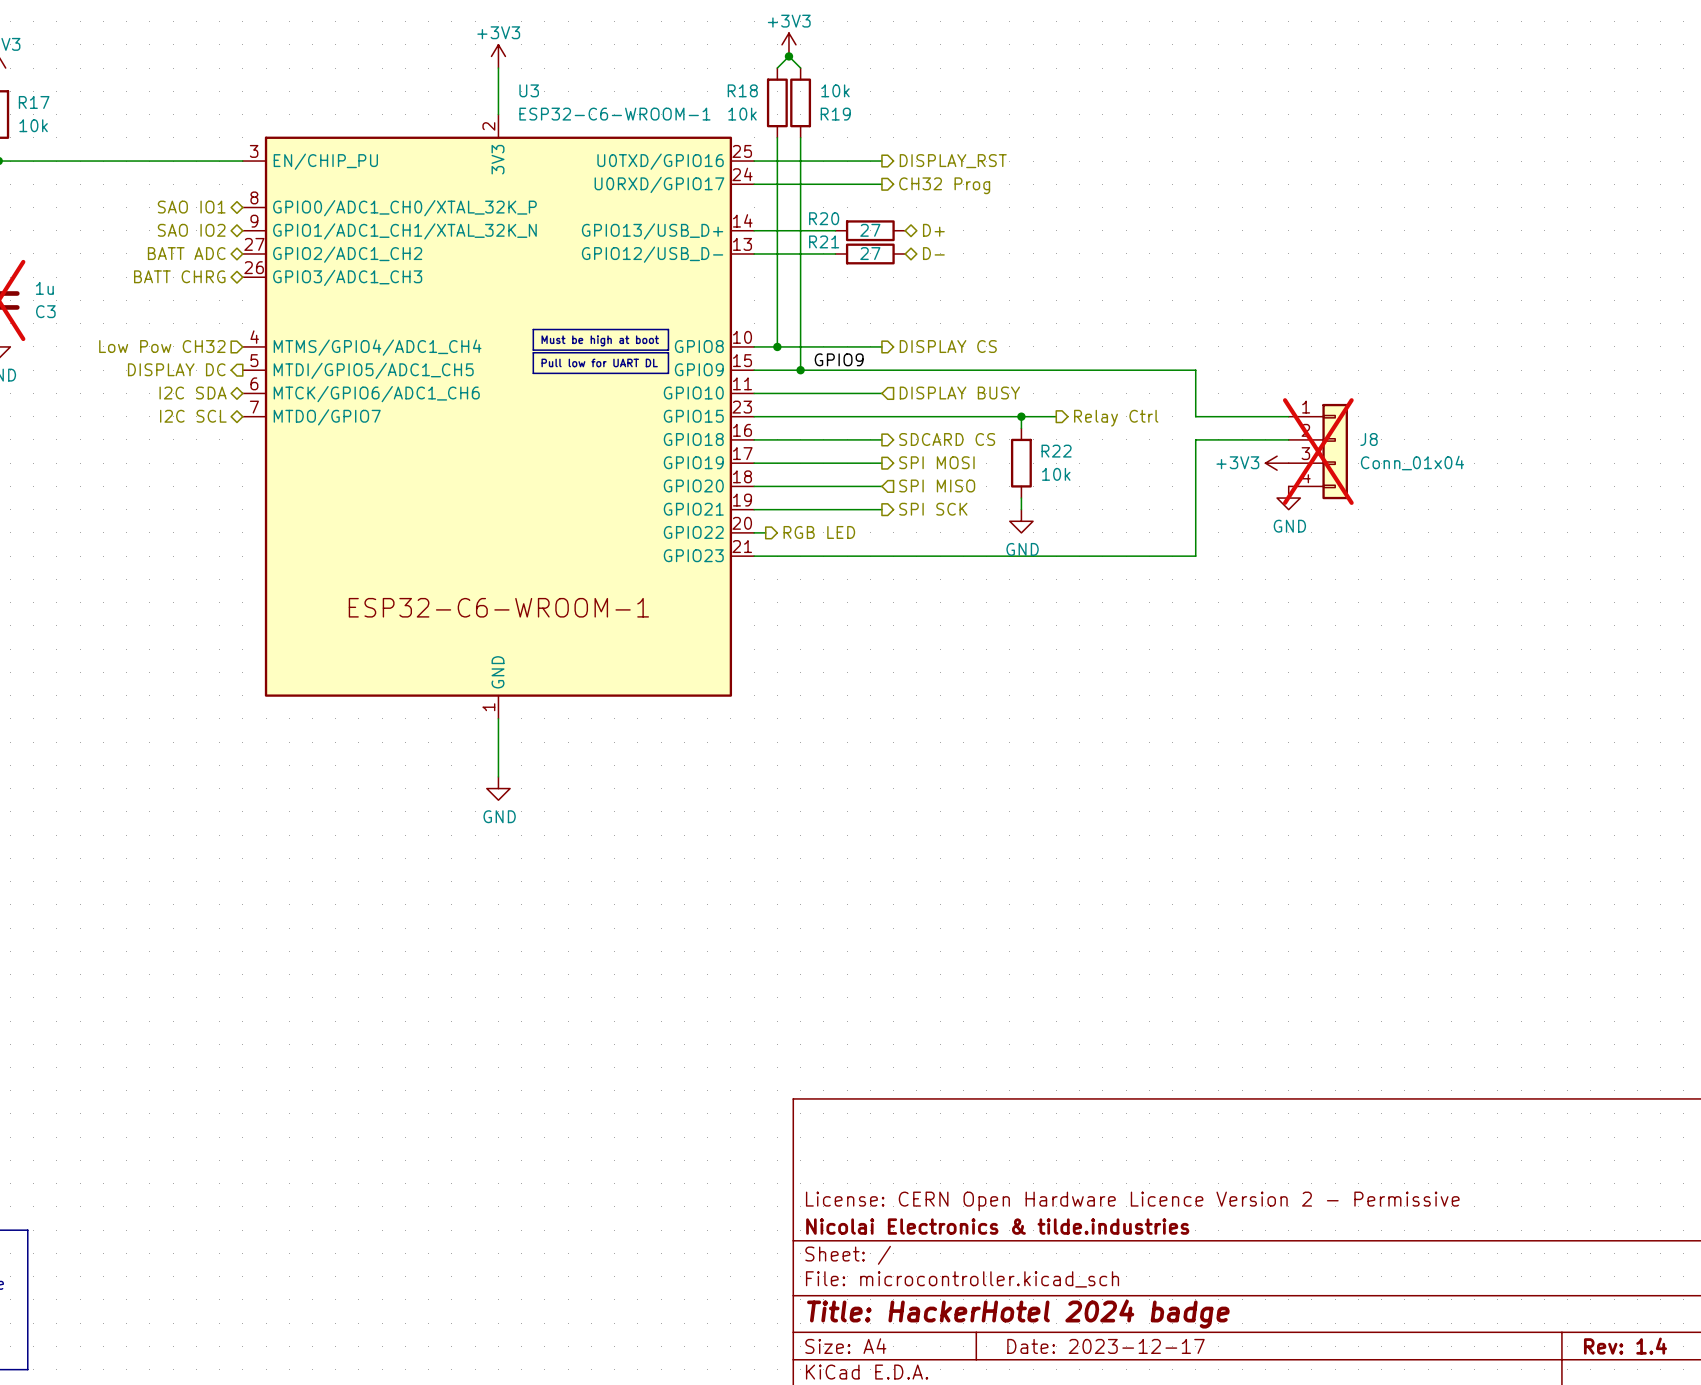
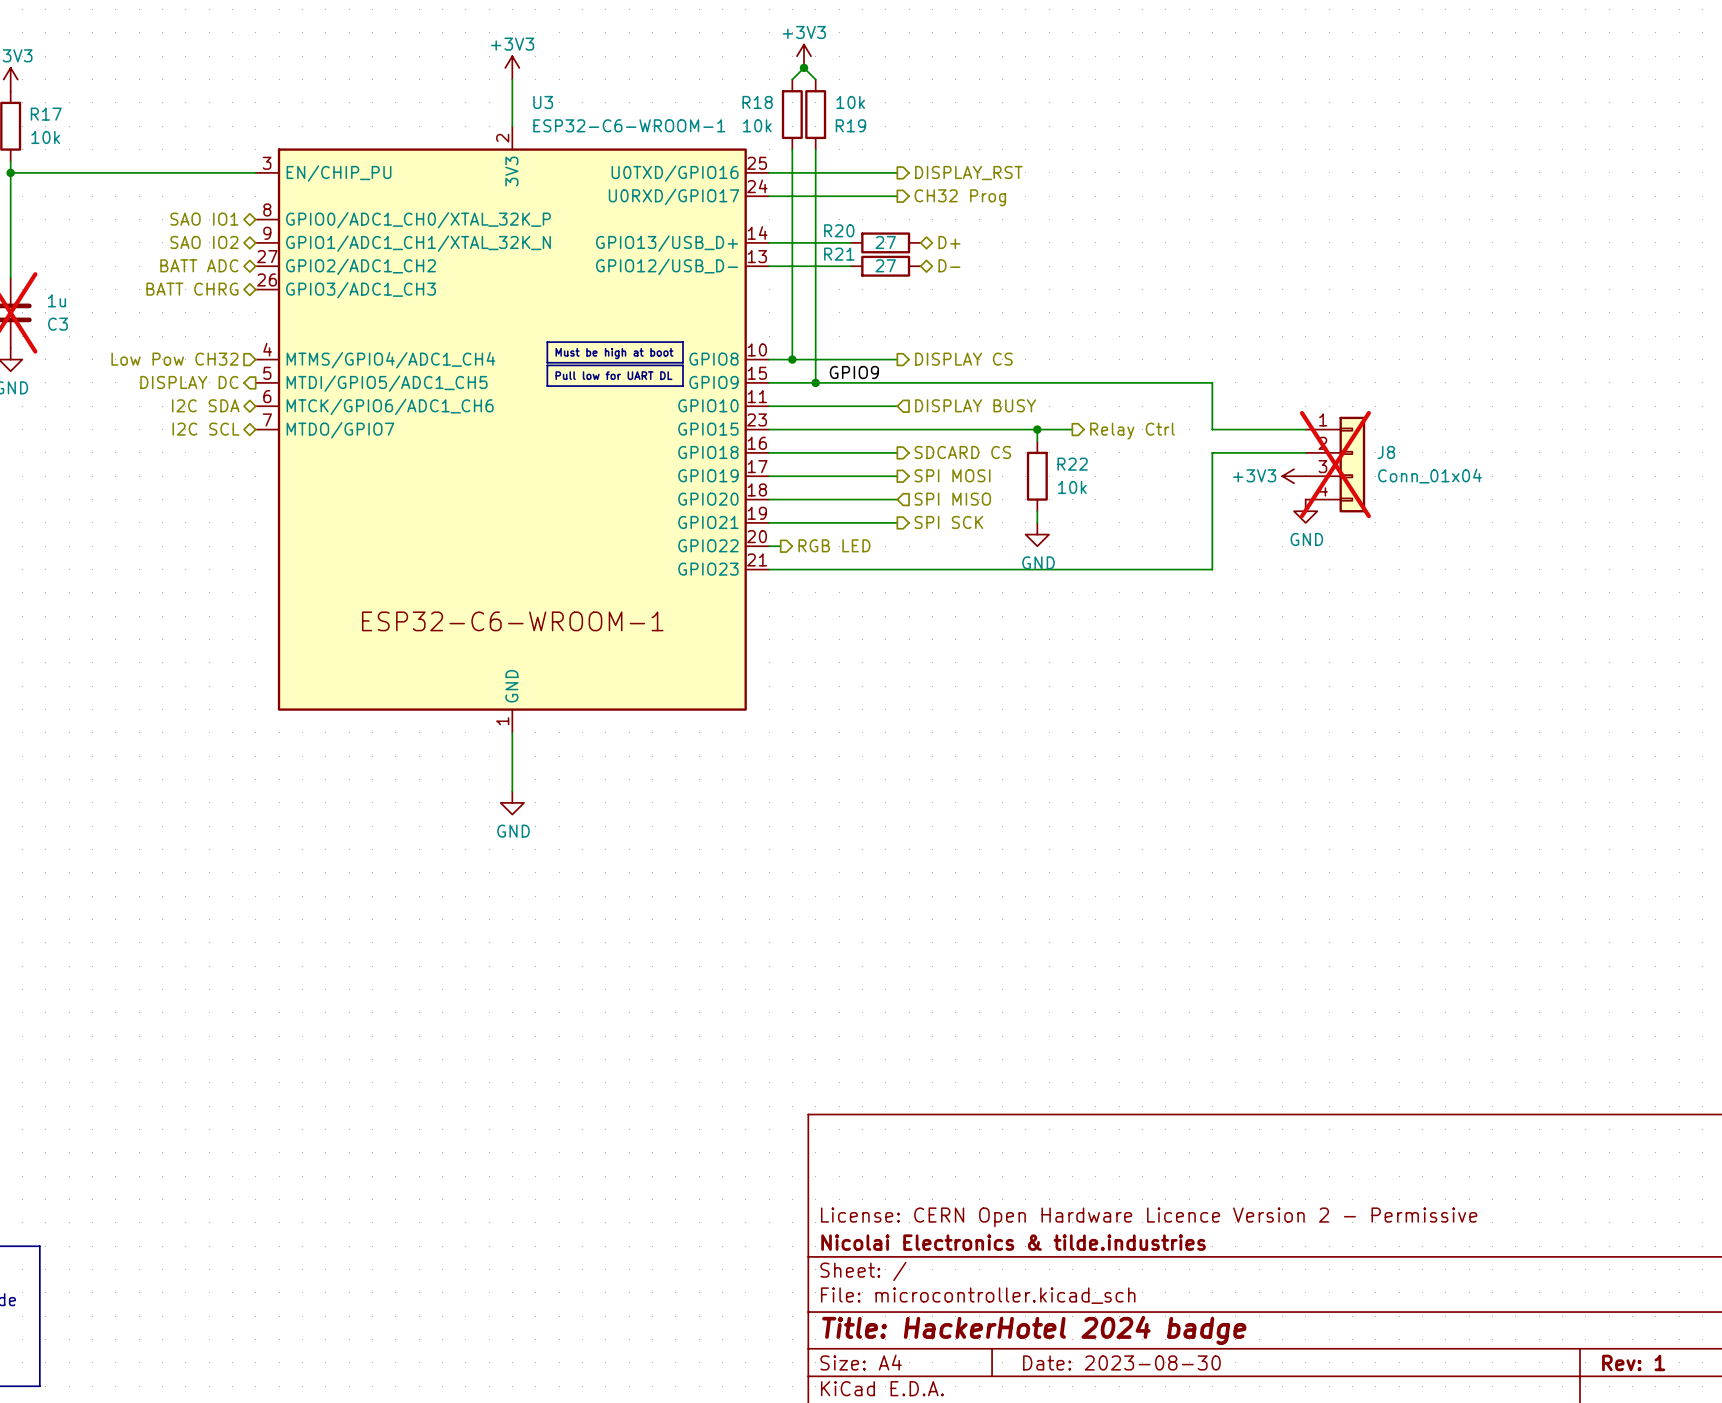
title block: Date: 2023-12-17 (1105, 1346) -> Date: 2023-08-30 (1121, 1362)
title block: Rev: 1.4 (1625, 1346) -> Rev: 1 (1633, 1362)

